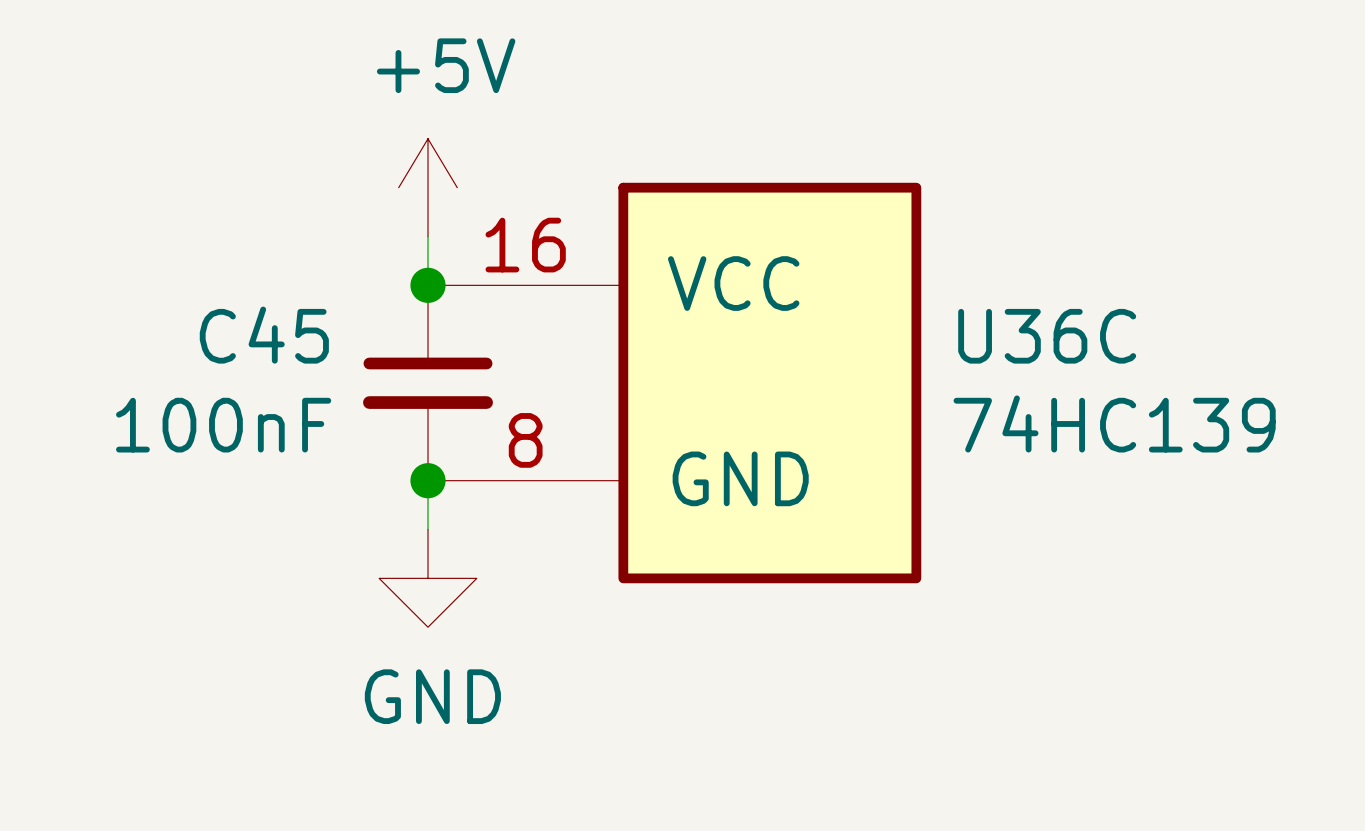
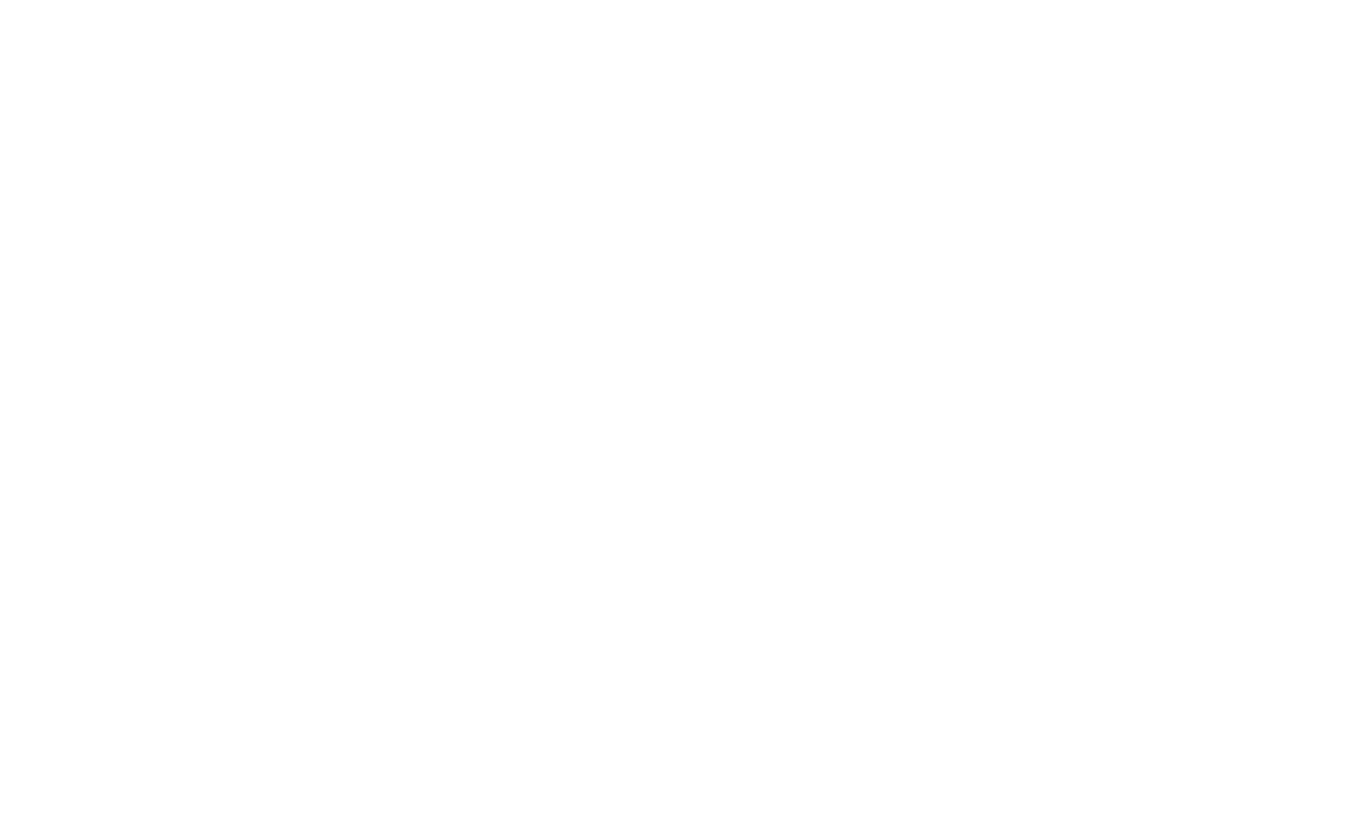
power symbol: +5V (427, 187) -> none
wire: (427, 236) (427, 285) -> none
junction: (427, 285) -> none
C45: 100nF (427, 383) -> none
U36C: 74HC139 (674, 383) -> none
wire: (427, 480) (427, 529) -> none
junction: (427, 480) -> none
power symbol: GND (427, 578) -> none

